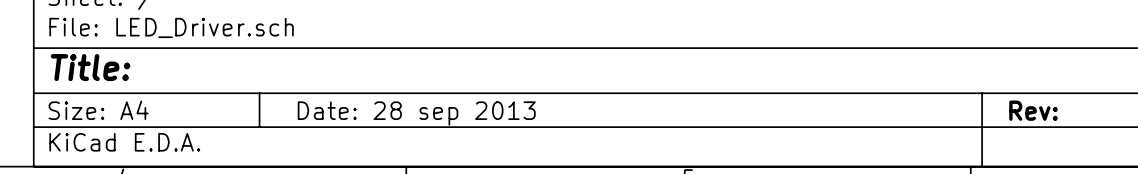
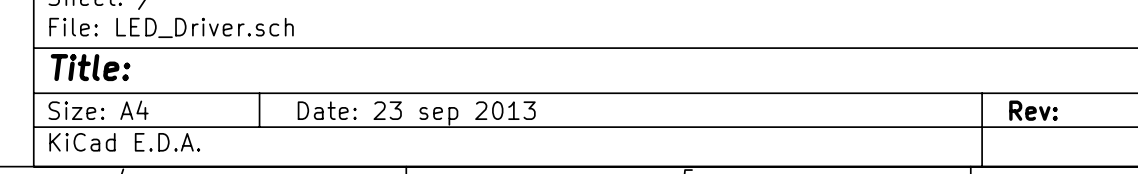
title block: Date: 28 sep 2013 (416, 113) -> Date: 23 sep 2013 (416, 113)

